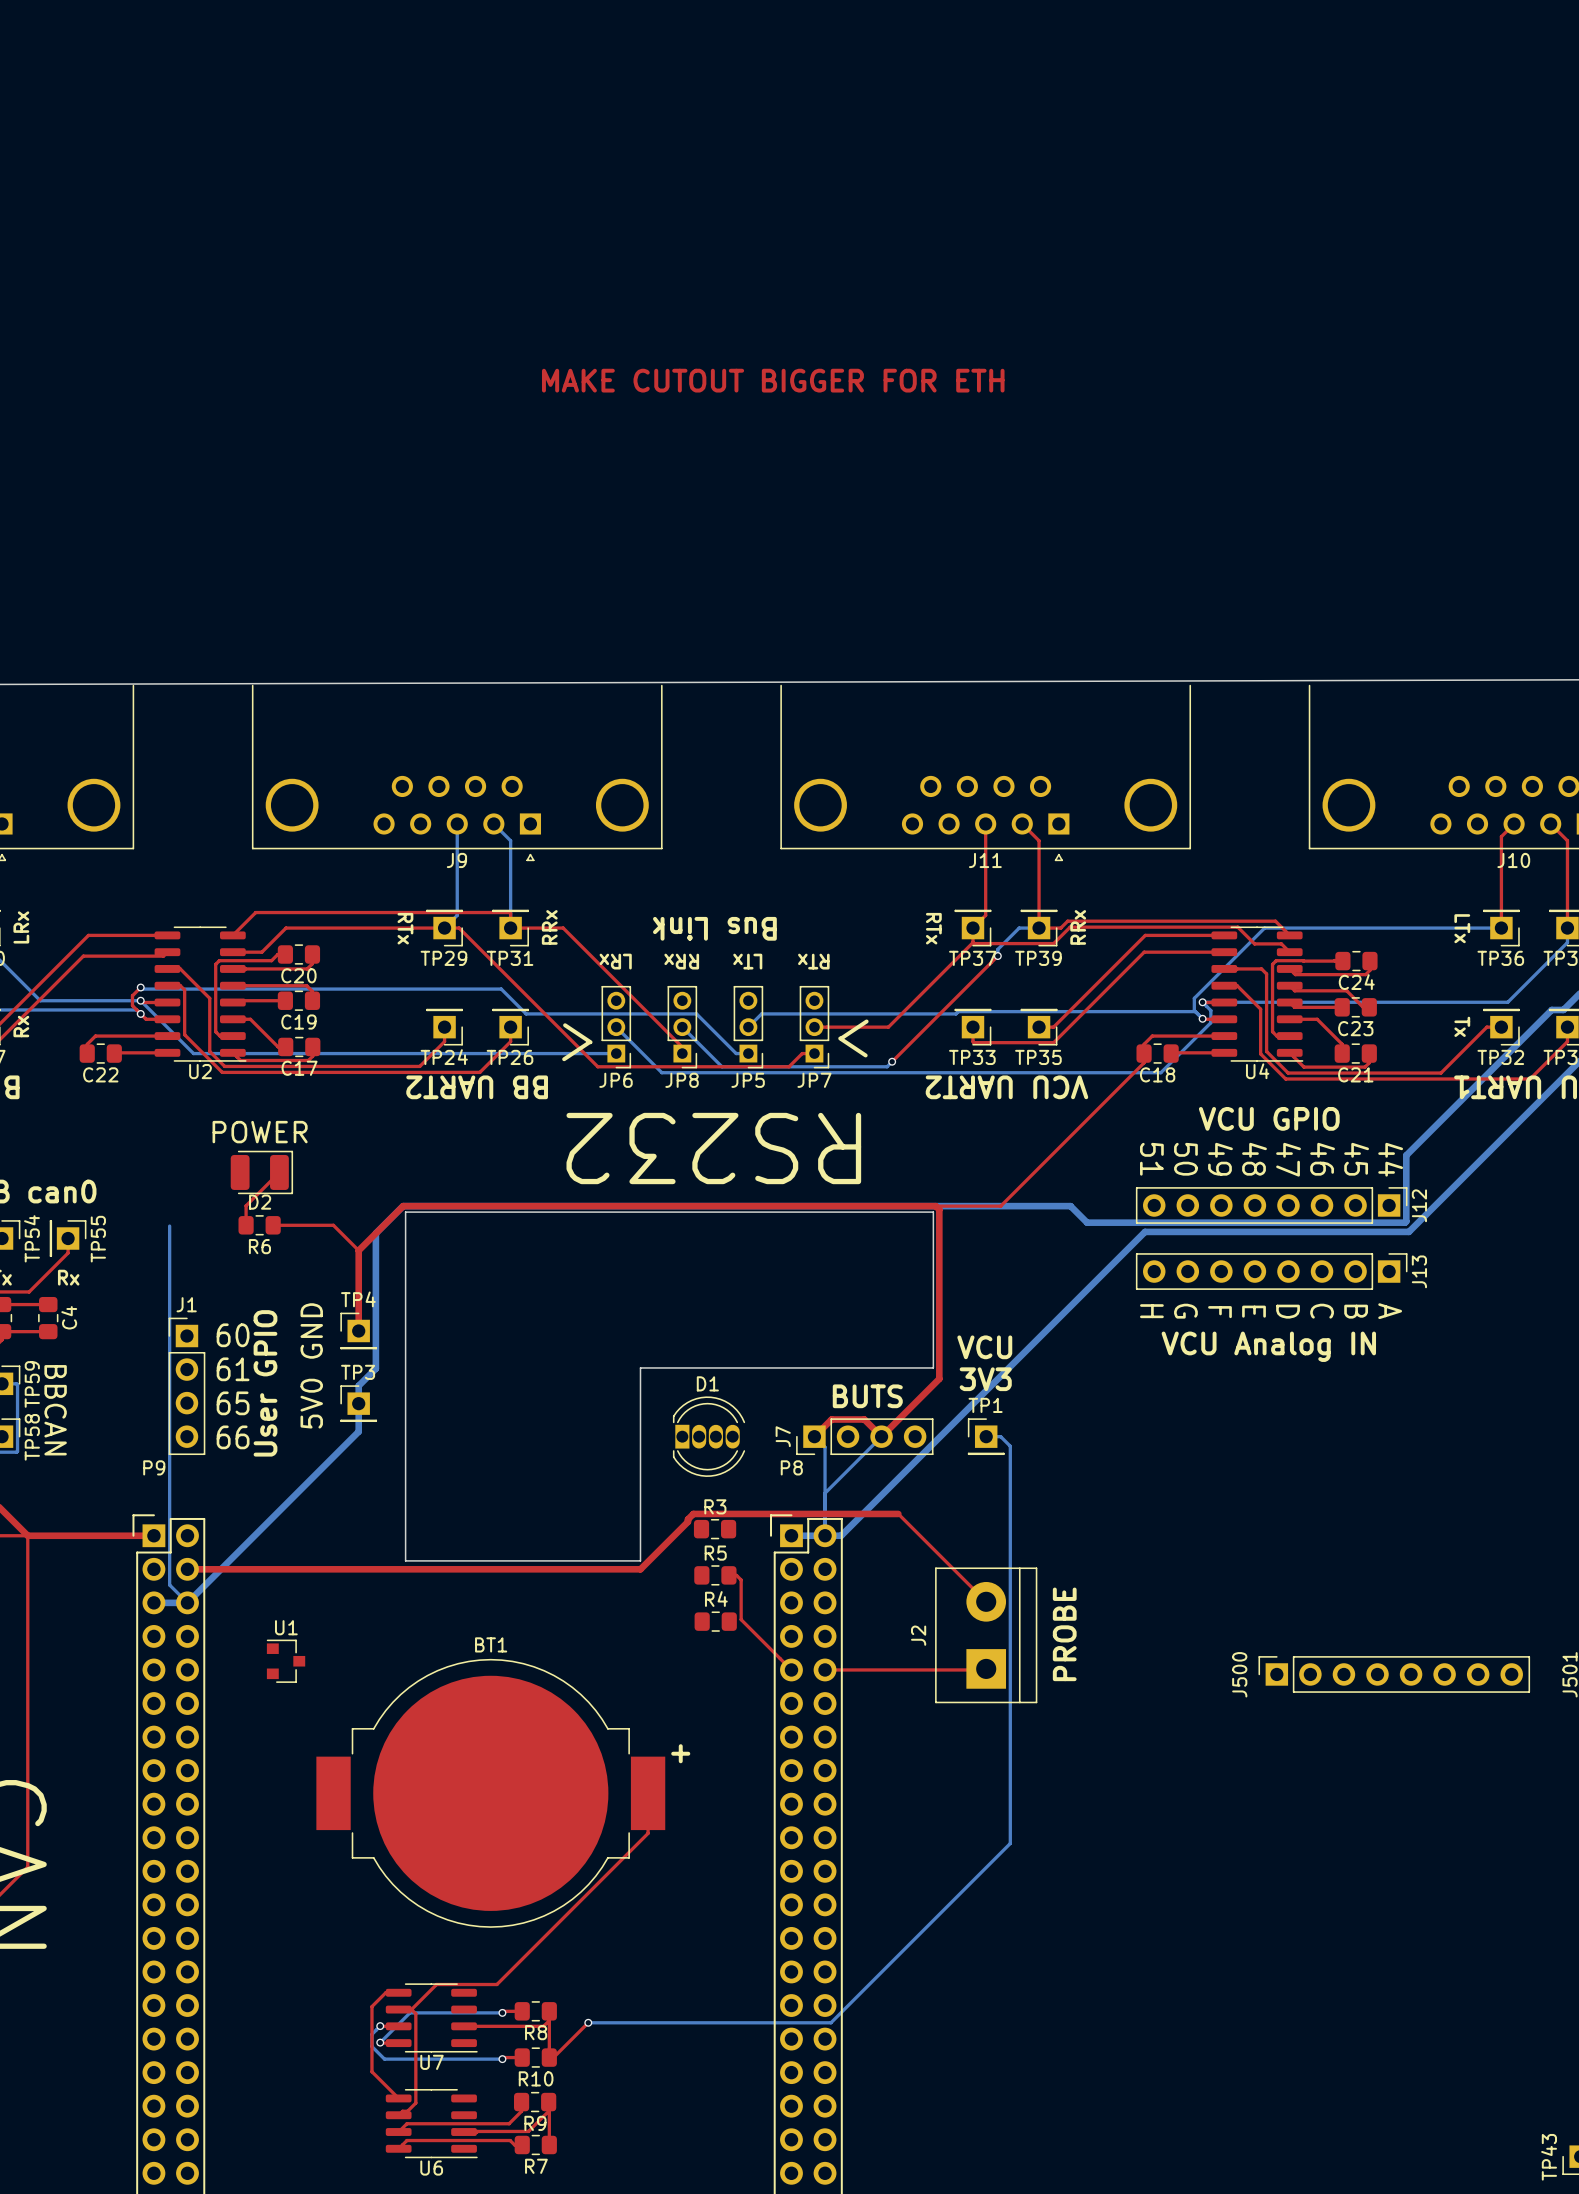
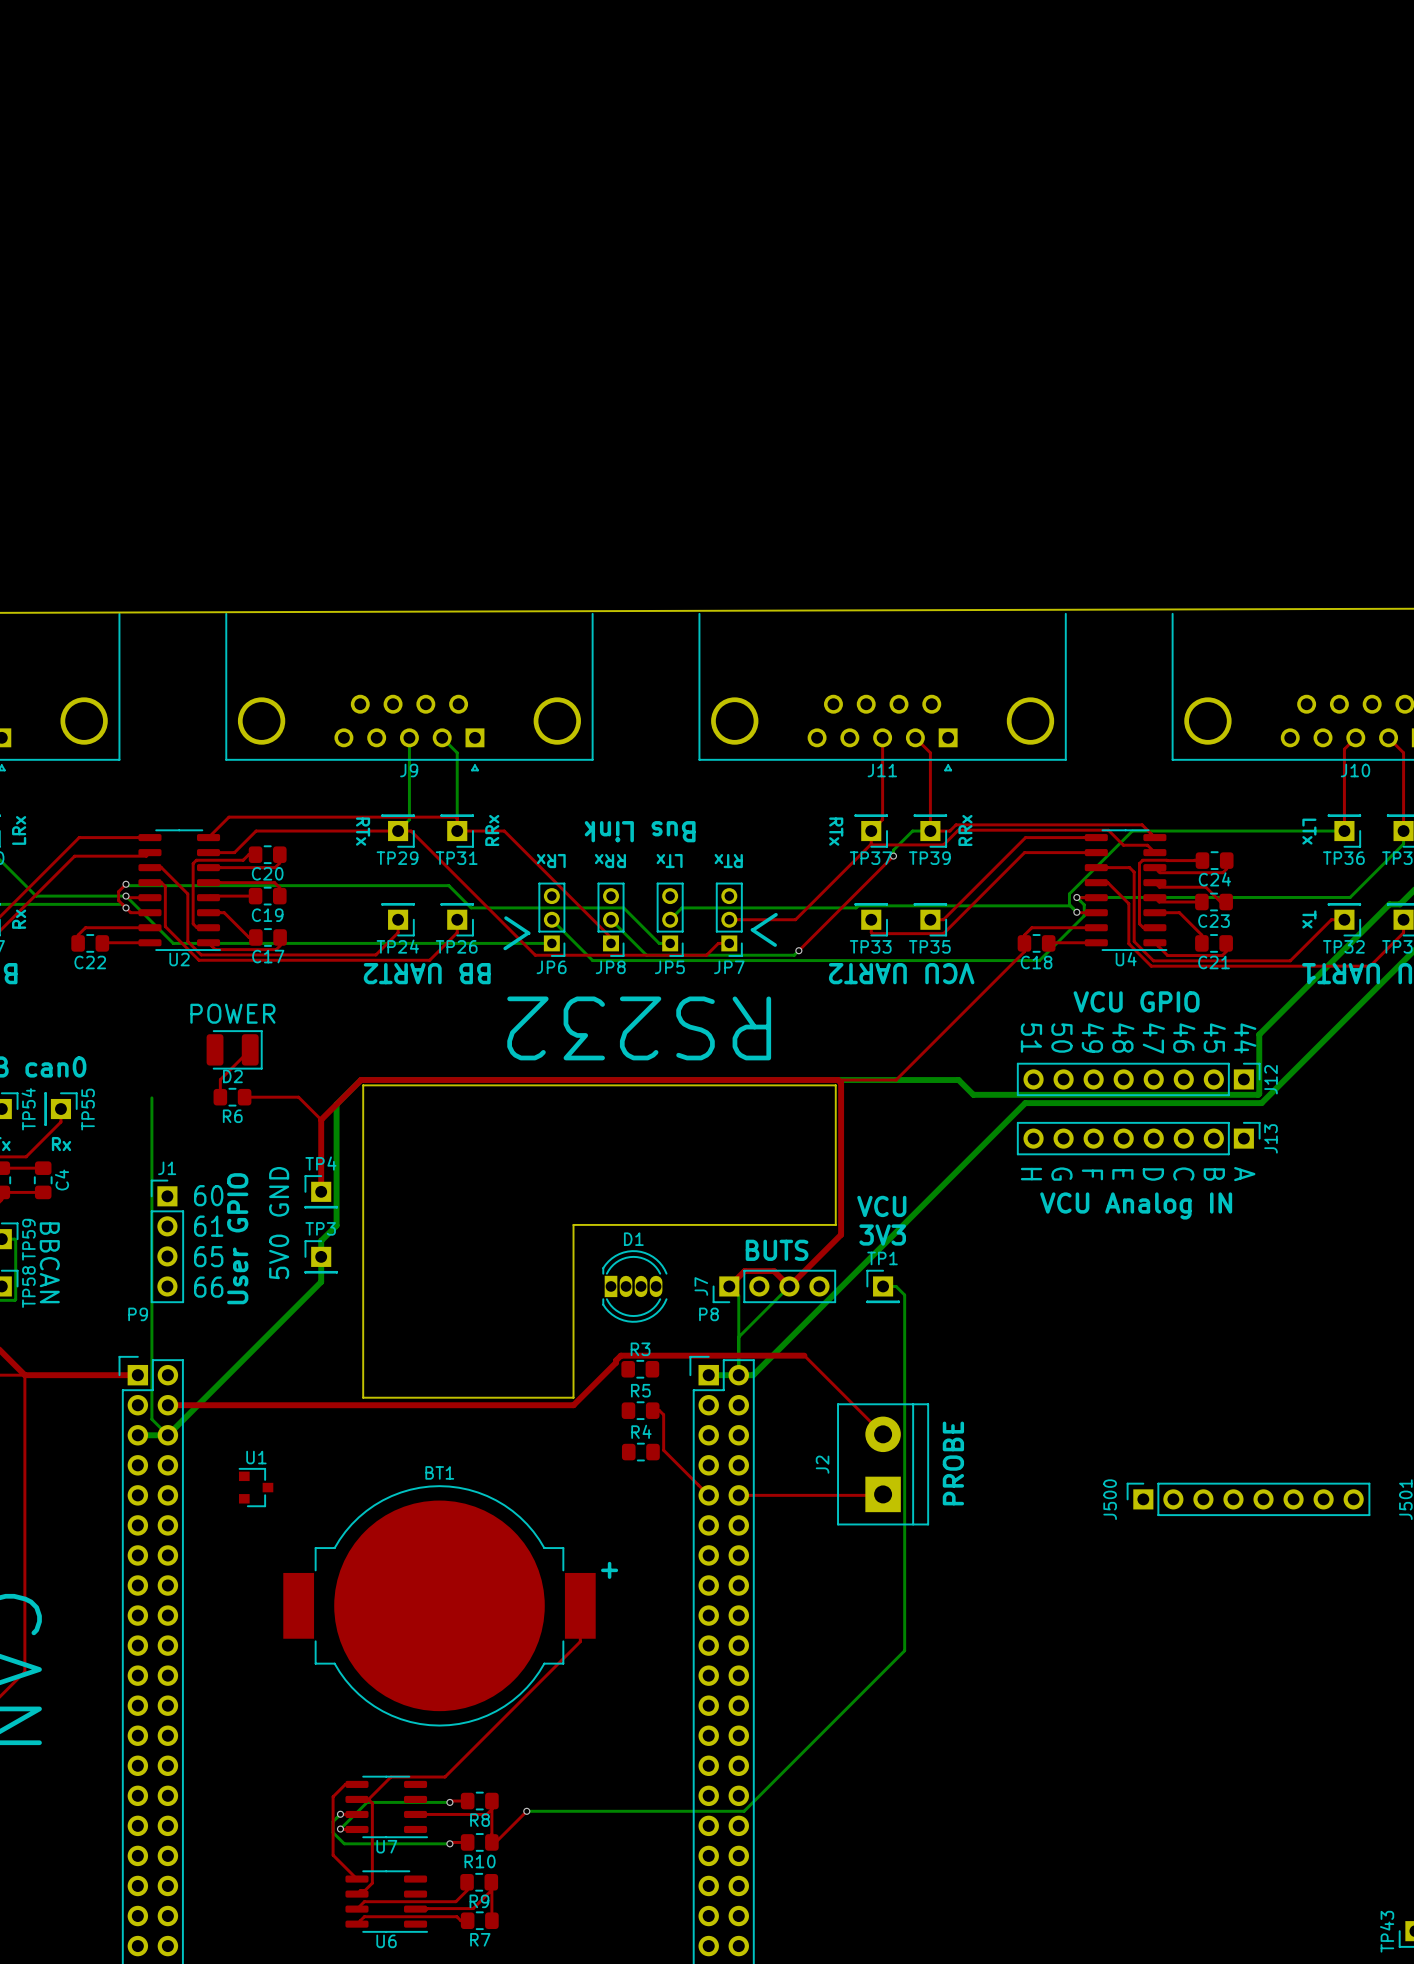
text: MAKE CUTOUT BIGGER FOR ETH (773, 380) -> none

